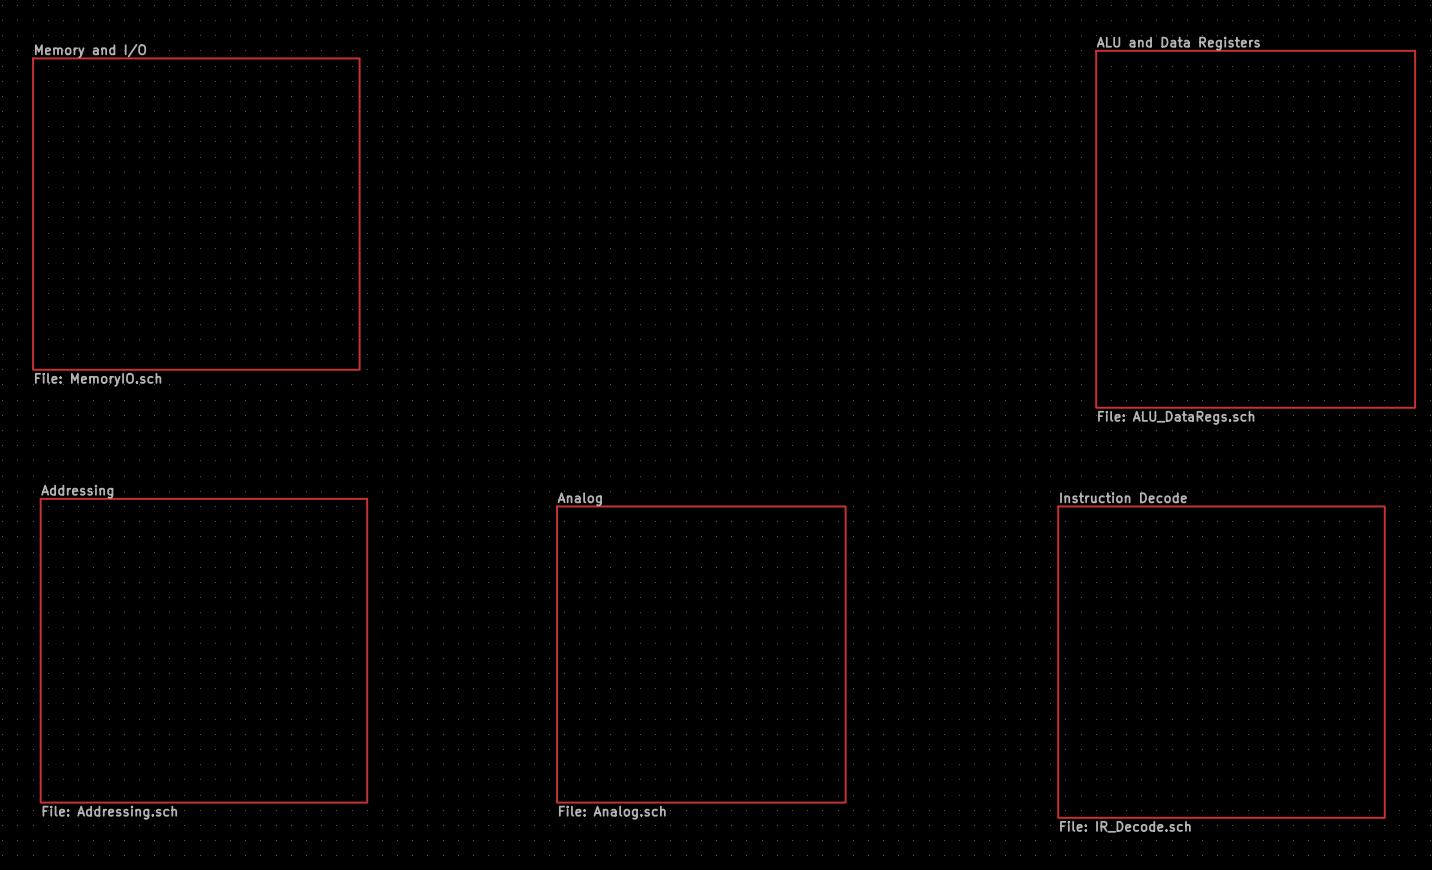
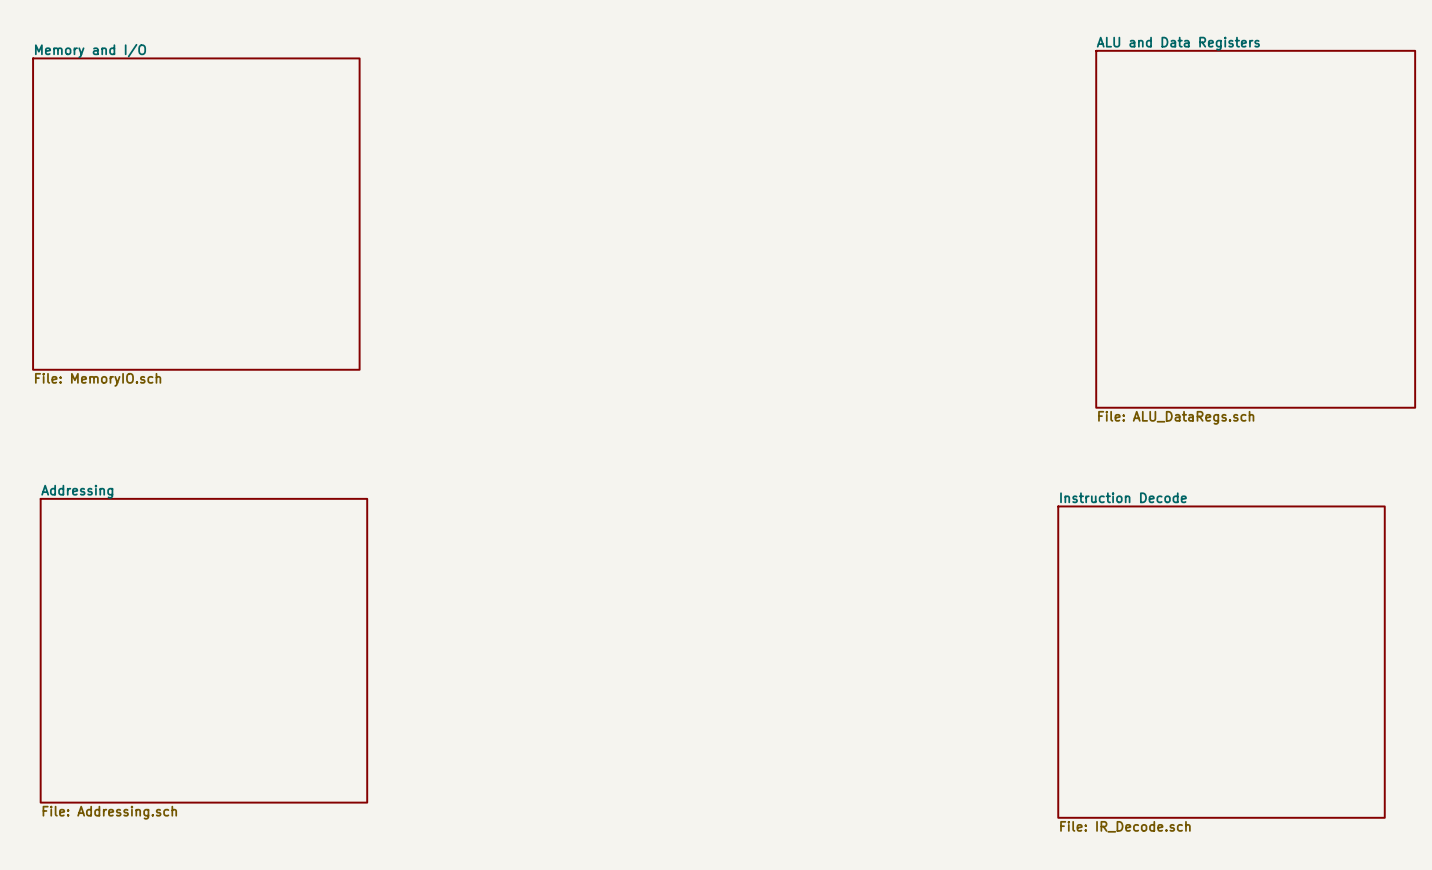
sheet Analog: File: Analog.sch (701, 654) -> none

